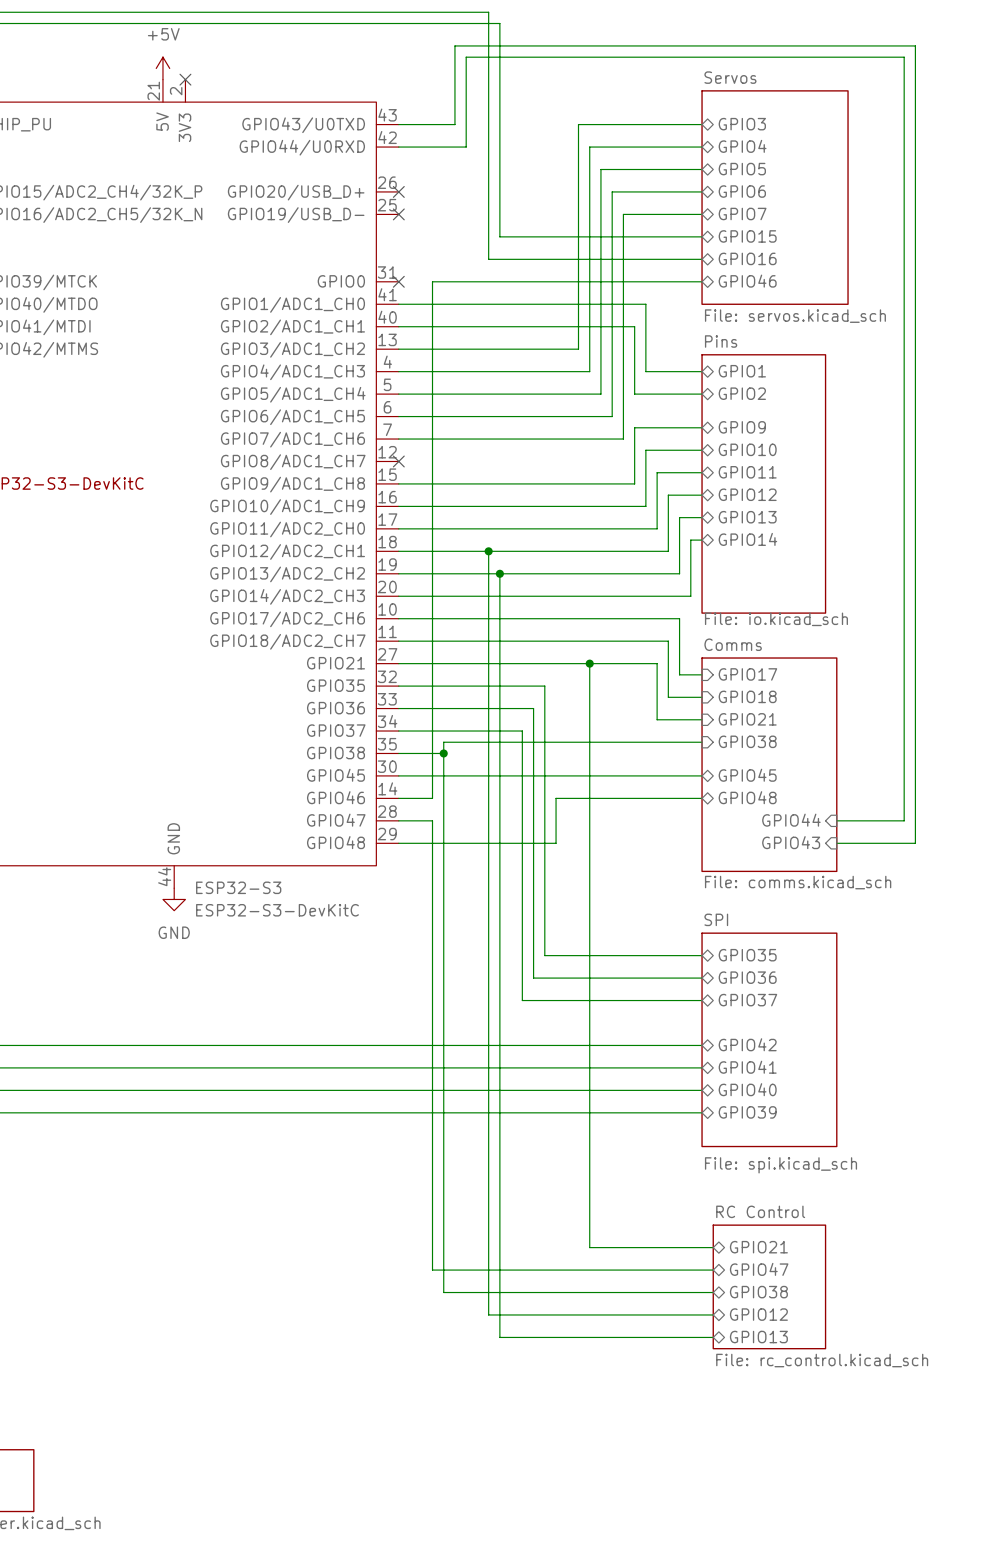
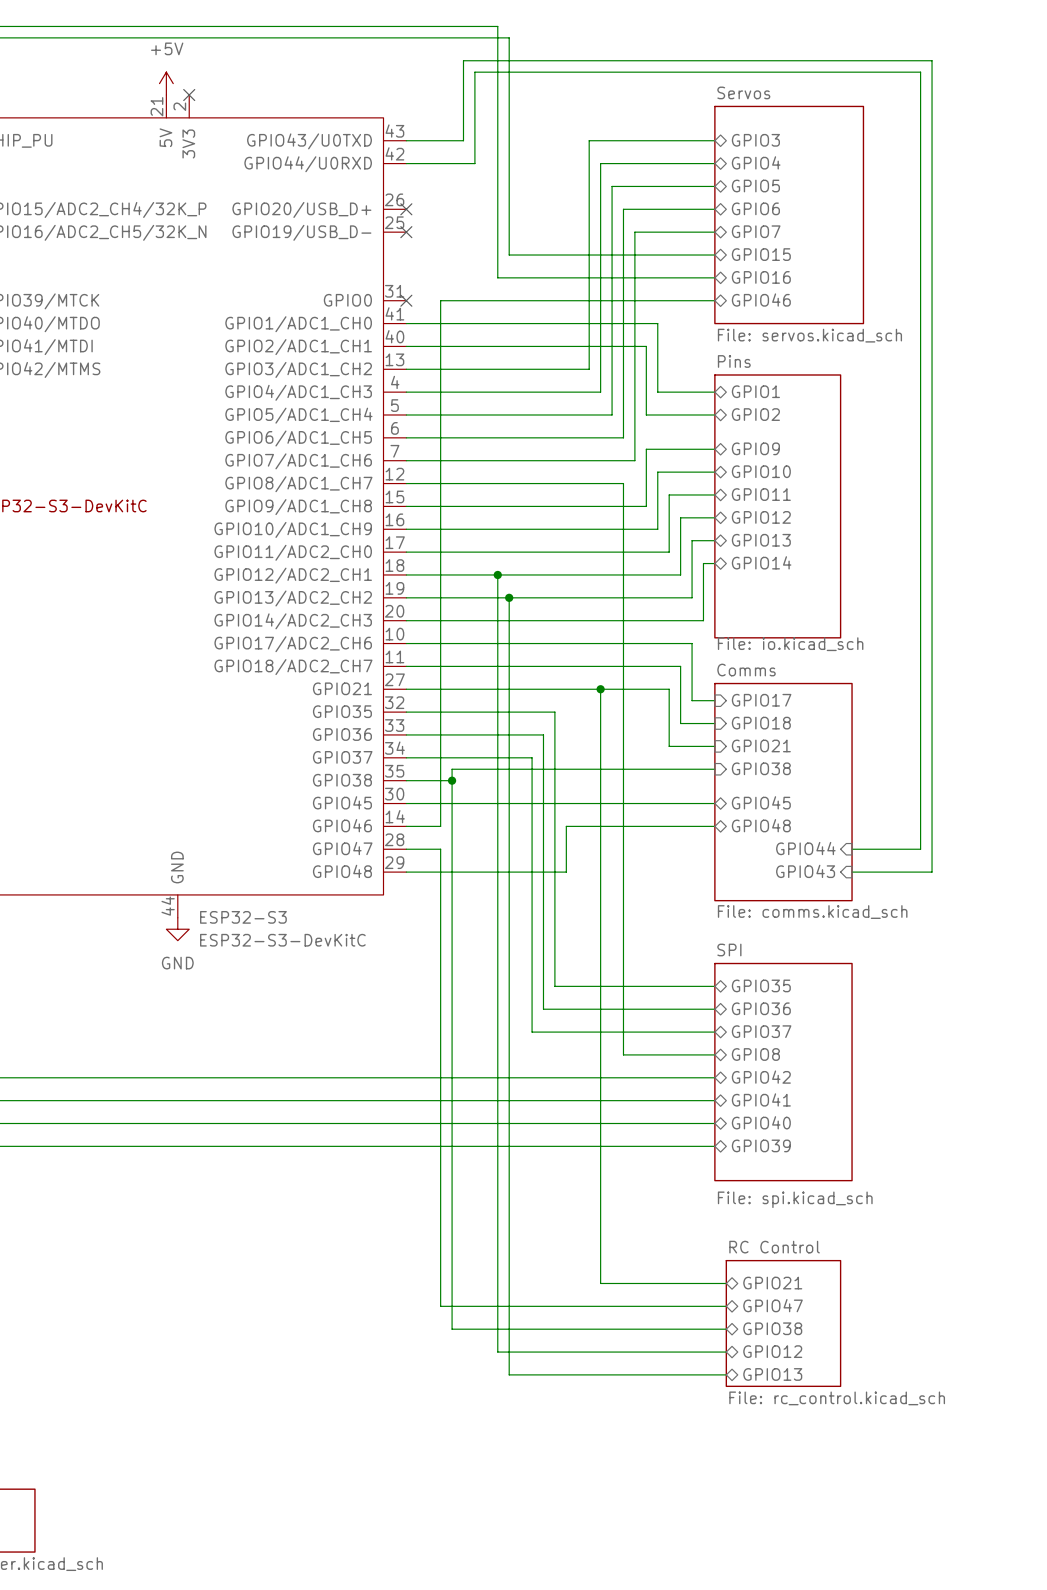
wire: none -> (406, 483) (623, 483) (623, 1054) (714, 1054)
no-connect mark: (398, 461) -> none
sheet pin: none -> GPIO8 (755, 1054)

